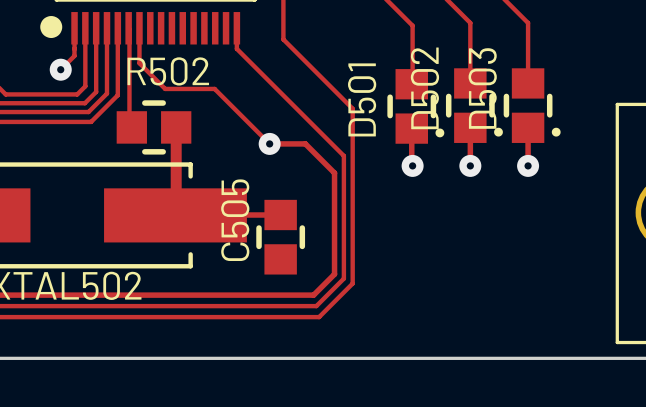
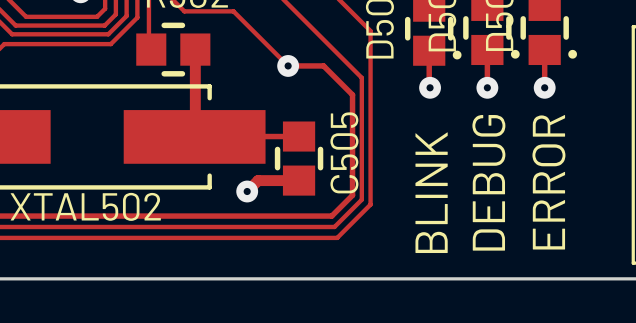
C505 name position: C505 (235, 220) -> C505 (344, 152)
track: none -> (299, 180) (258, 180) (247, 191)
text: none -> DEBUG (488, 182)
text: none -> ERROR (548, 182)
via: none -> (247, 191)
text: none -> BLINK (431, 192)

